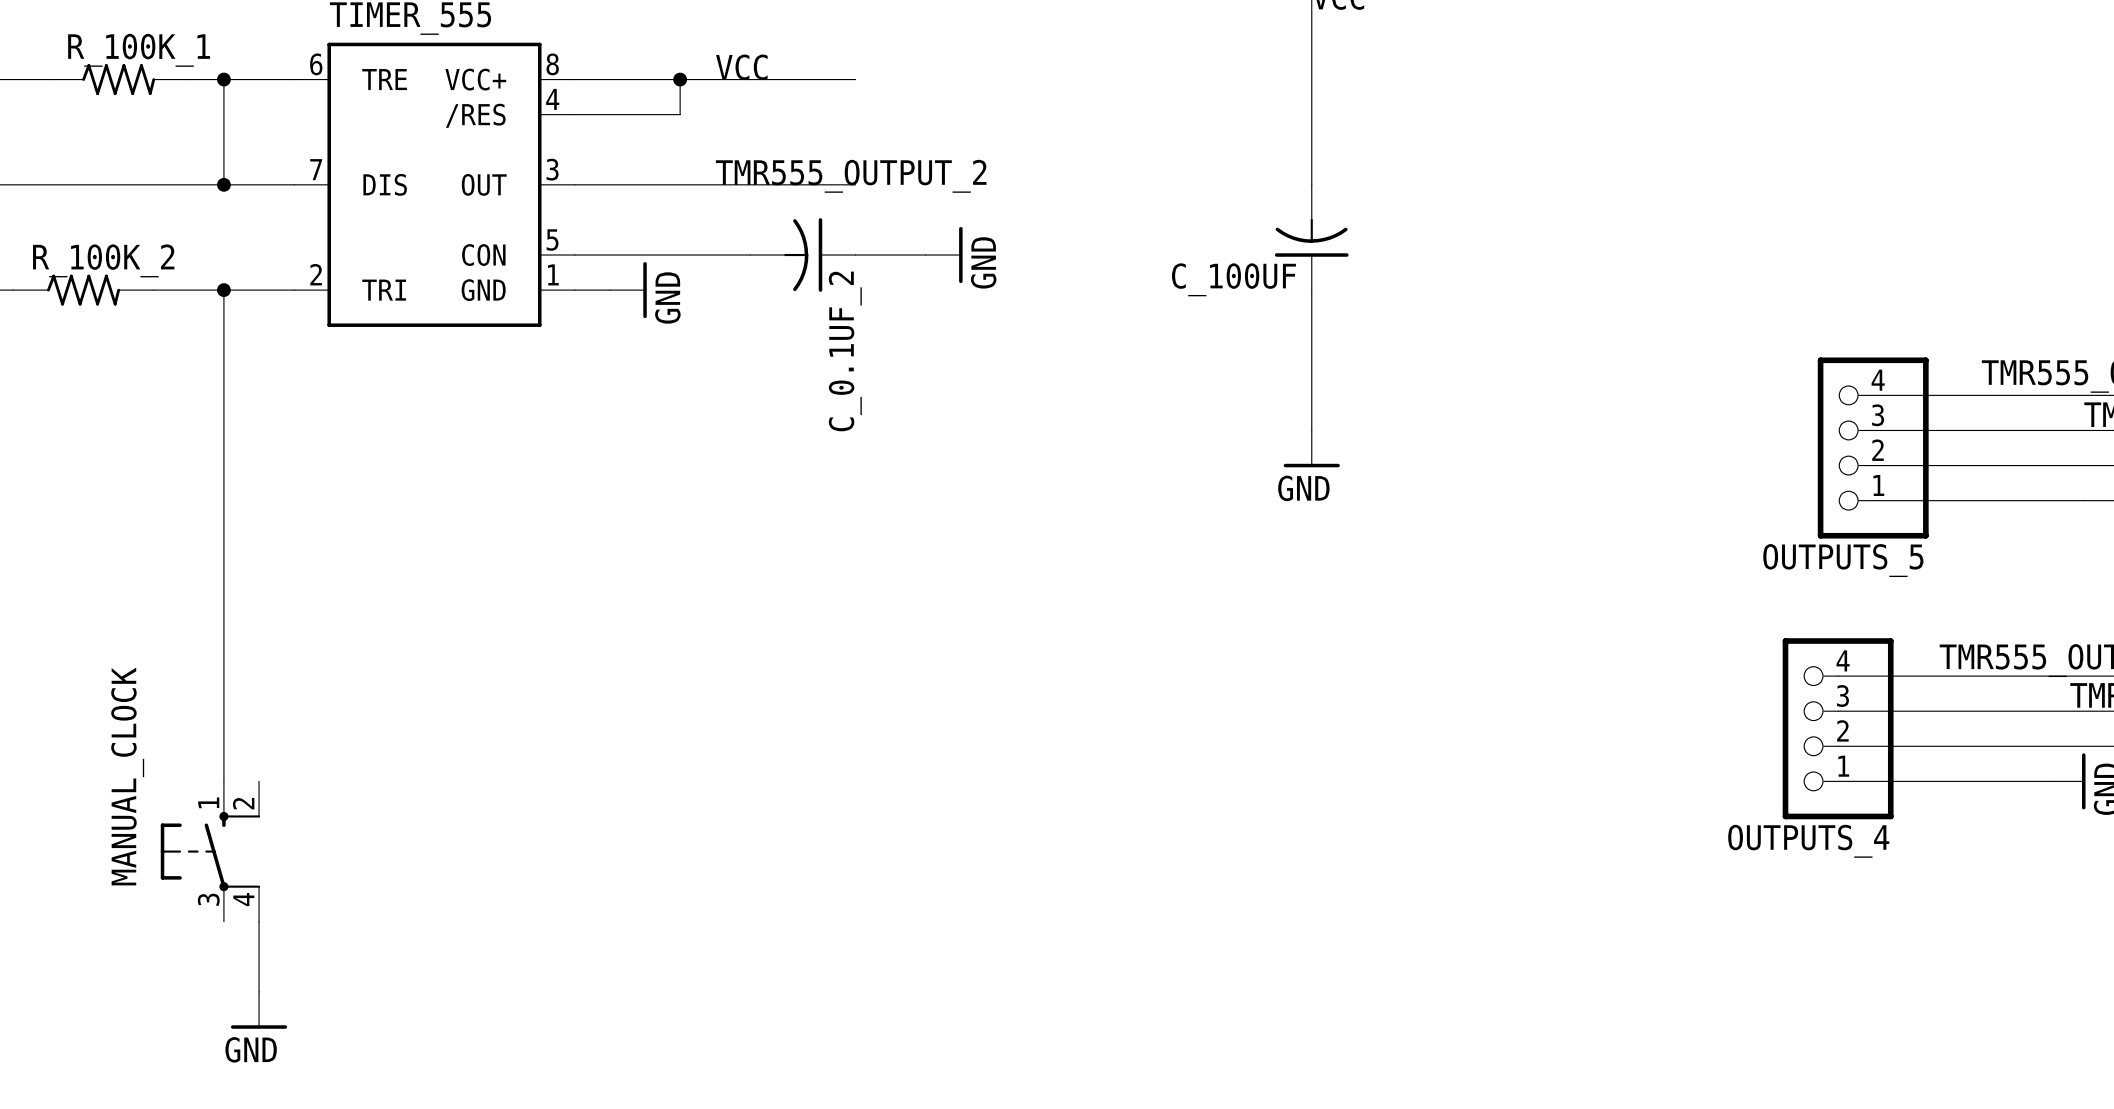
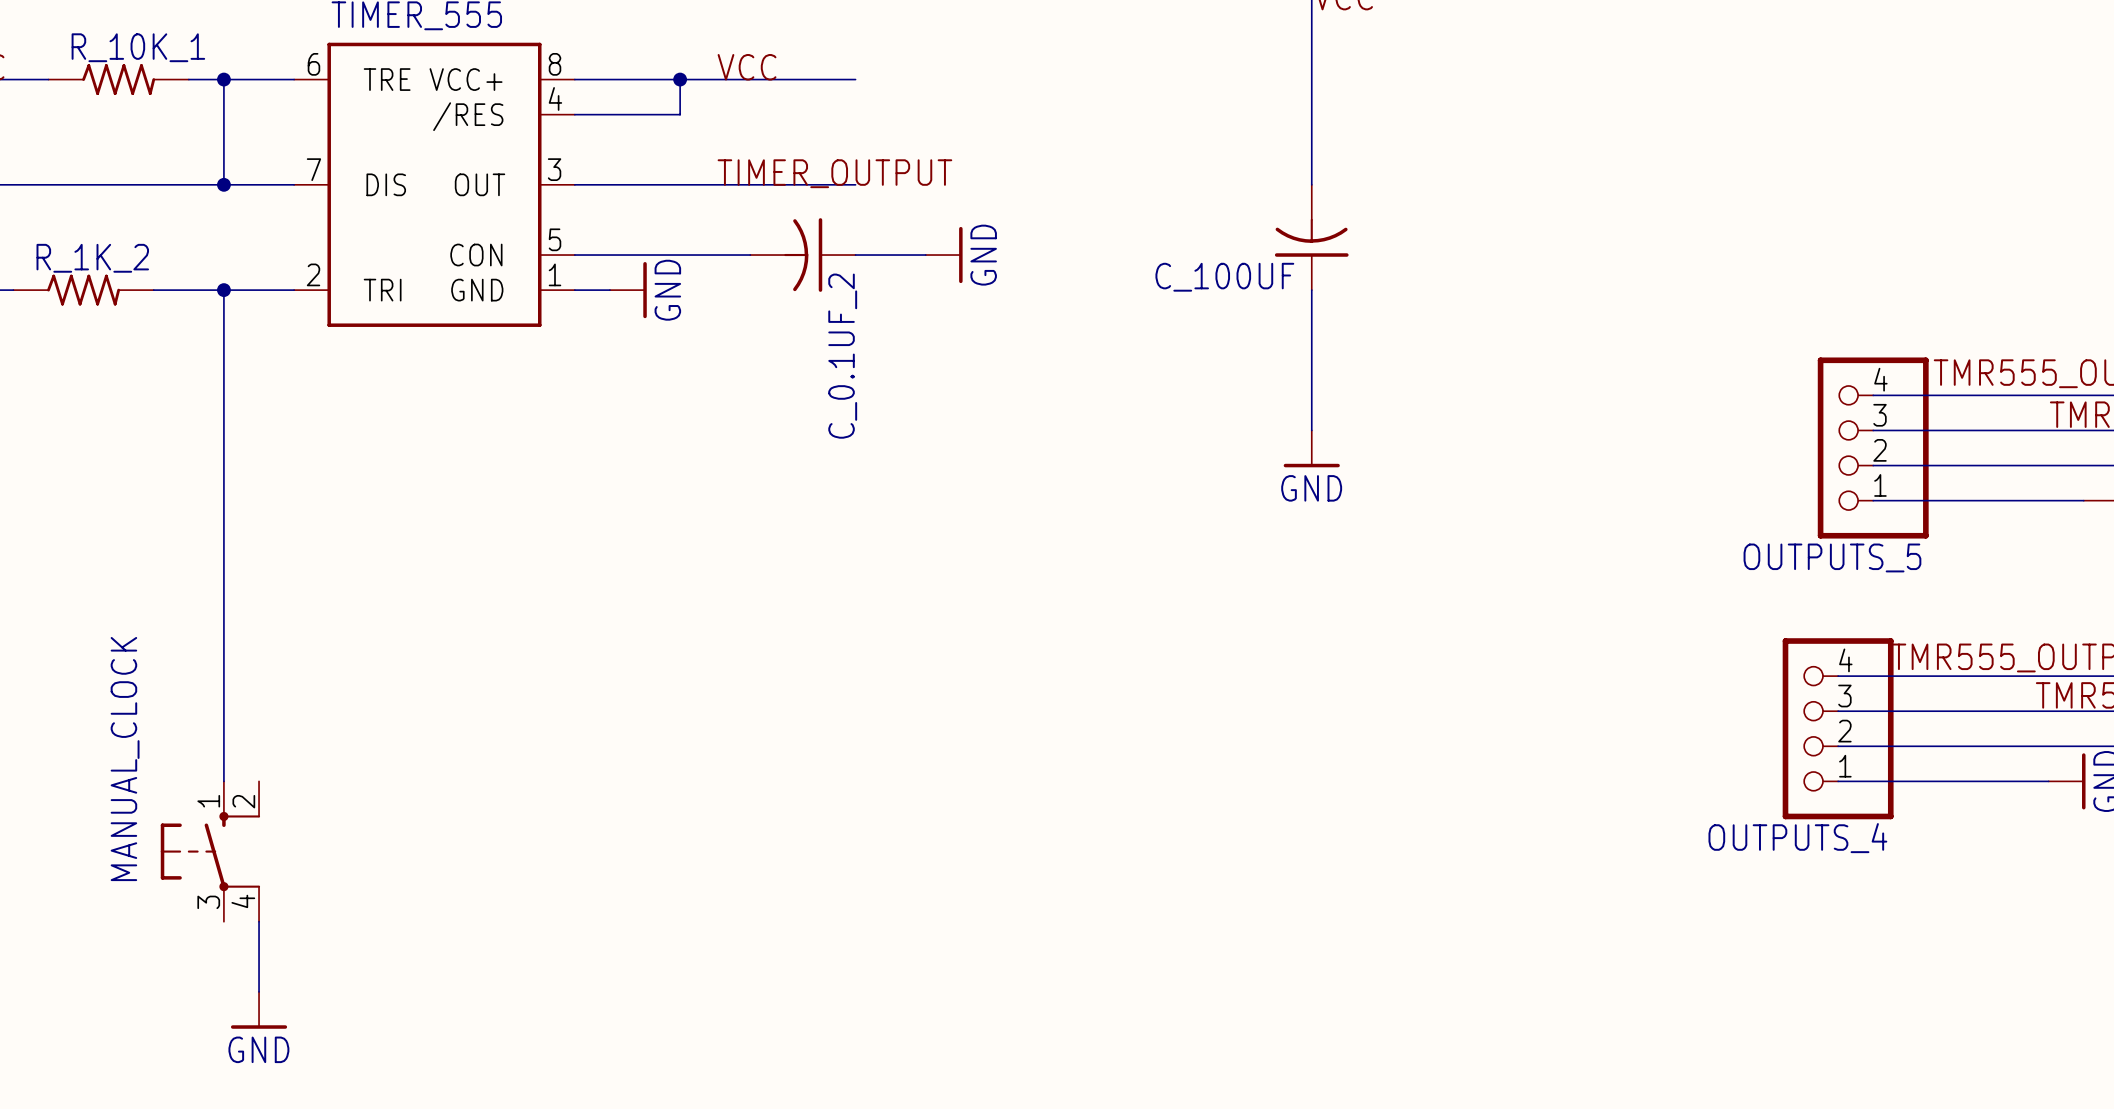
R_100K_1 name: R_100K_1 (139, 50) -> R_10K_1 (138, 47)
label: TMR555_OUTPUT_2 (851, 176) -> TIMER_OUTPUT (834, 173)
R_100K_2 name: R_100K_2 (103, 260) -> R_1K_2 (92, 258)

